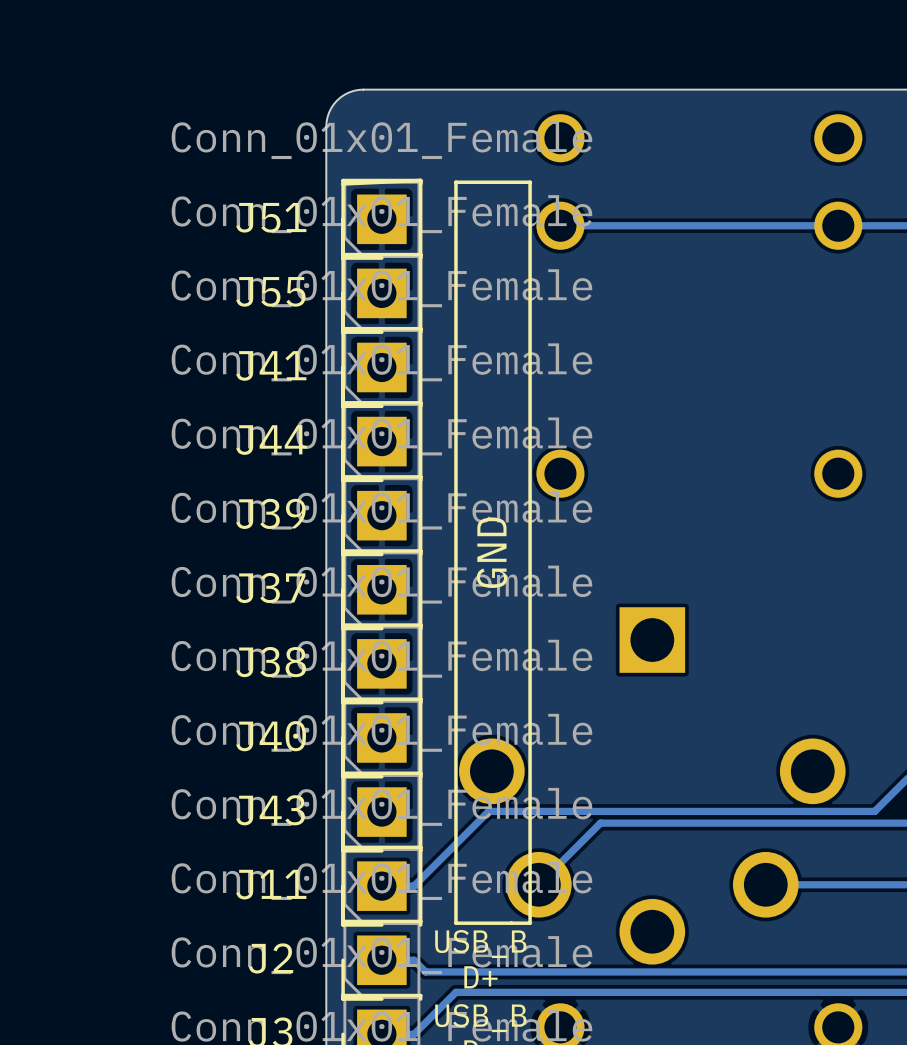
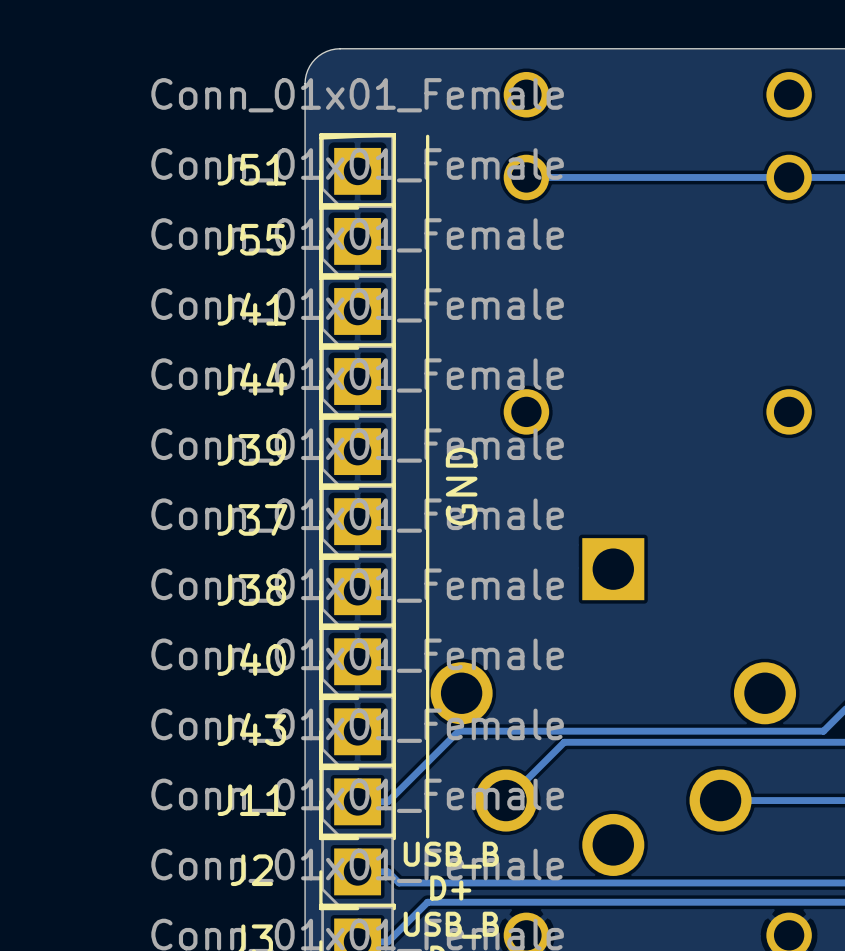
line: (455, 182) (530, 182) (530, 923) (455, 923) -> none

